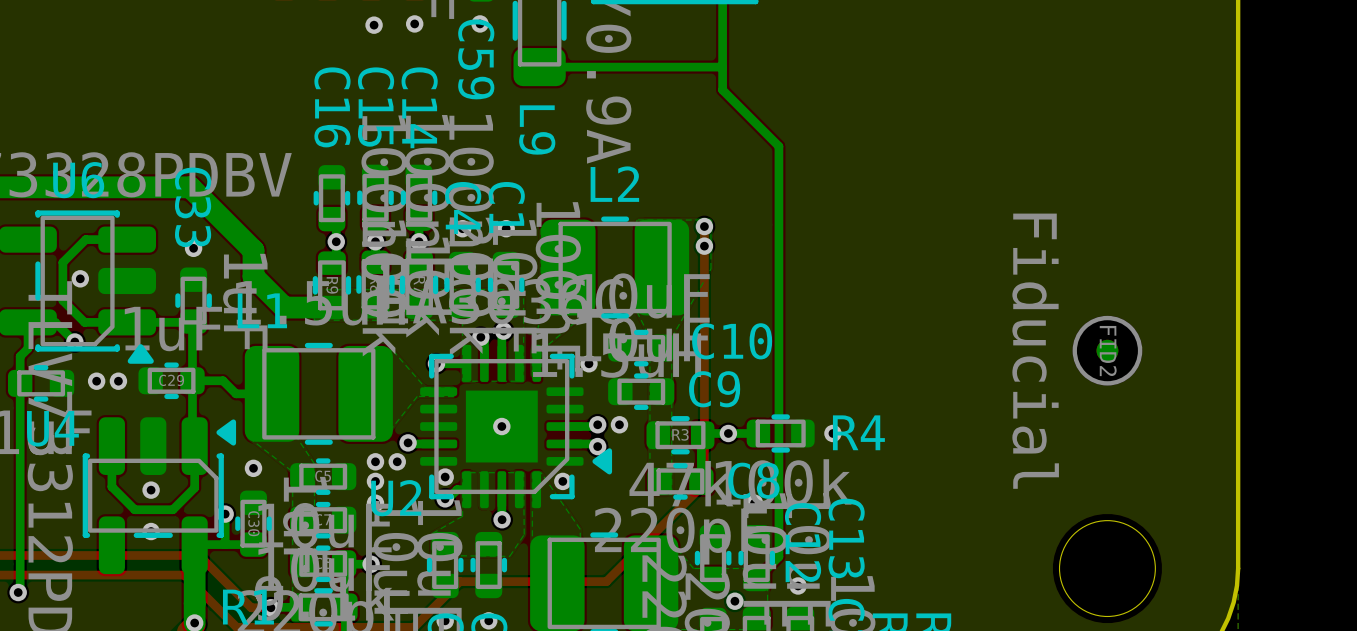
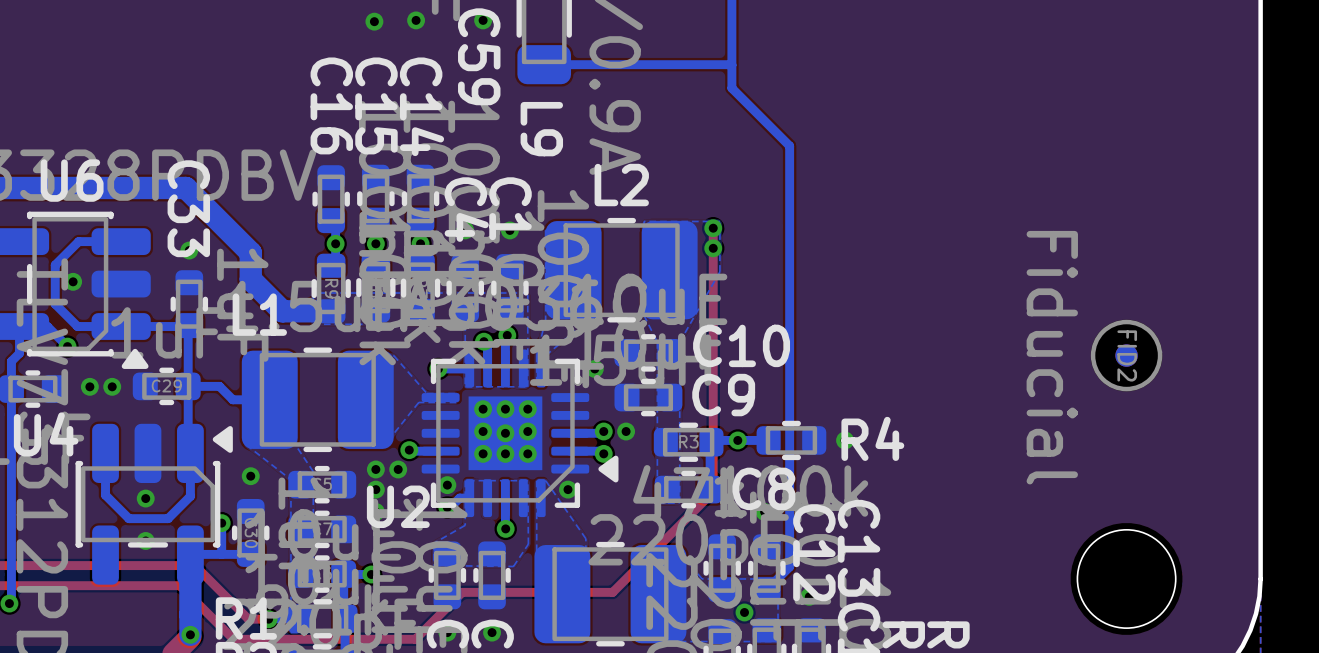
via: none -> (483, 409)
via: none -> (505, 409)
via: none -> (527, 409)
via: none -> (483, 431)
via: none -> (527, 431)
via: none -> (483, 453)
via: none -> (505, 453)
via: none -> (527, 453)

